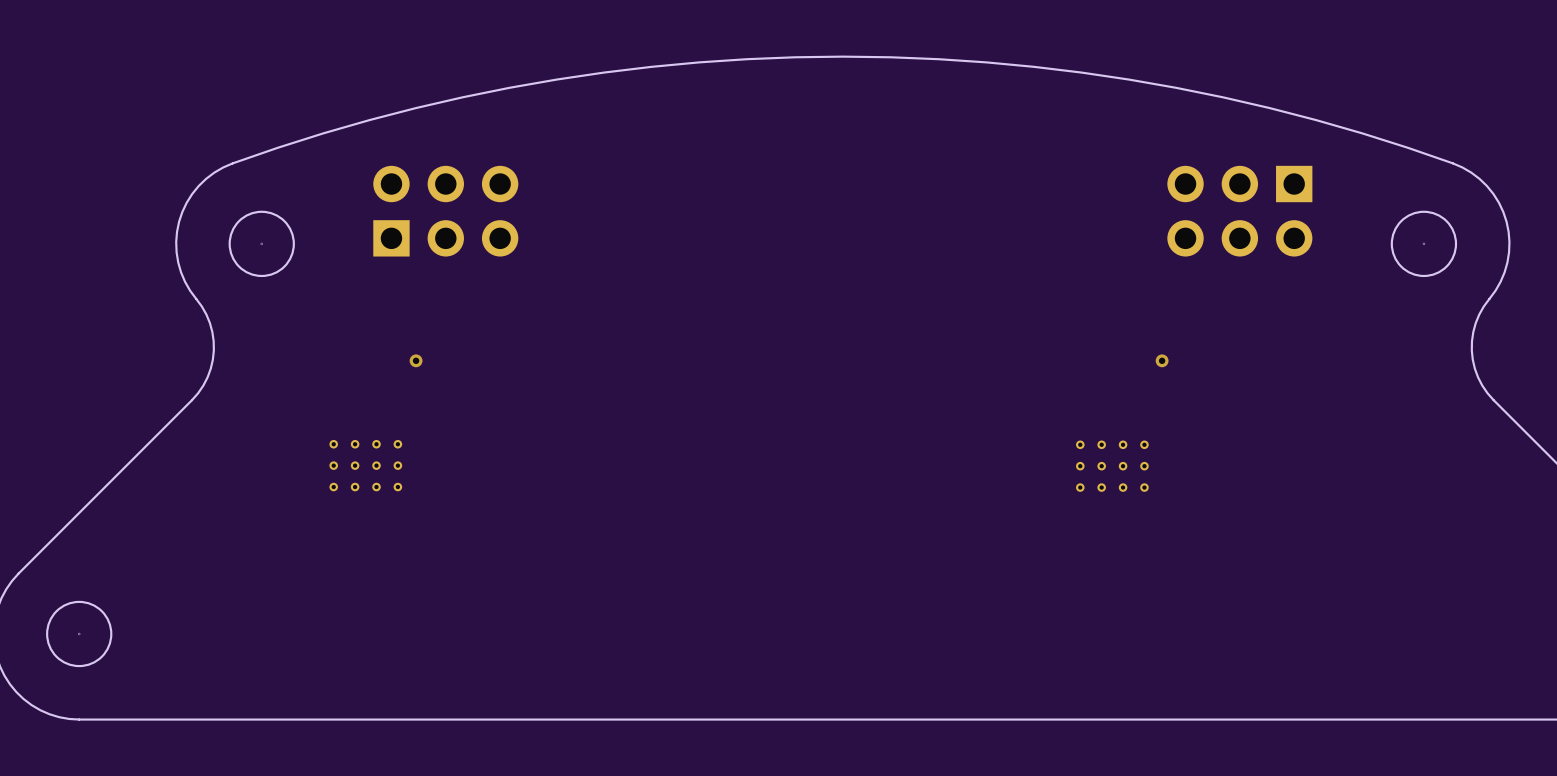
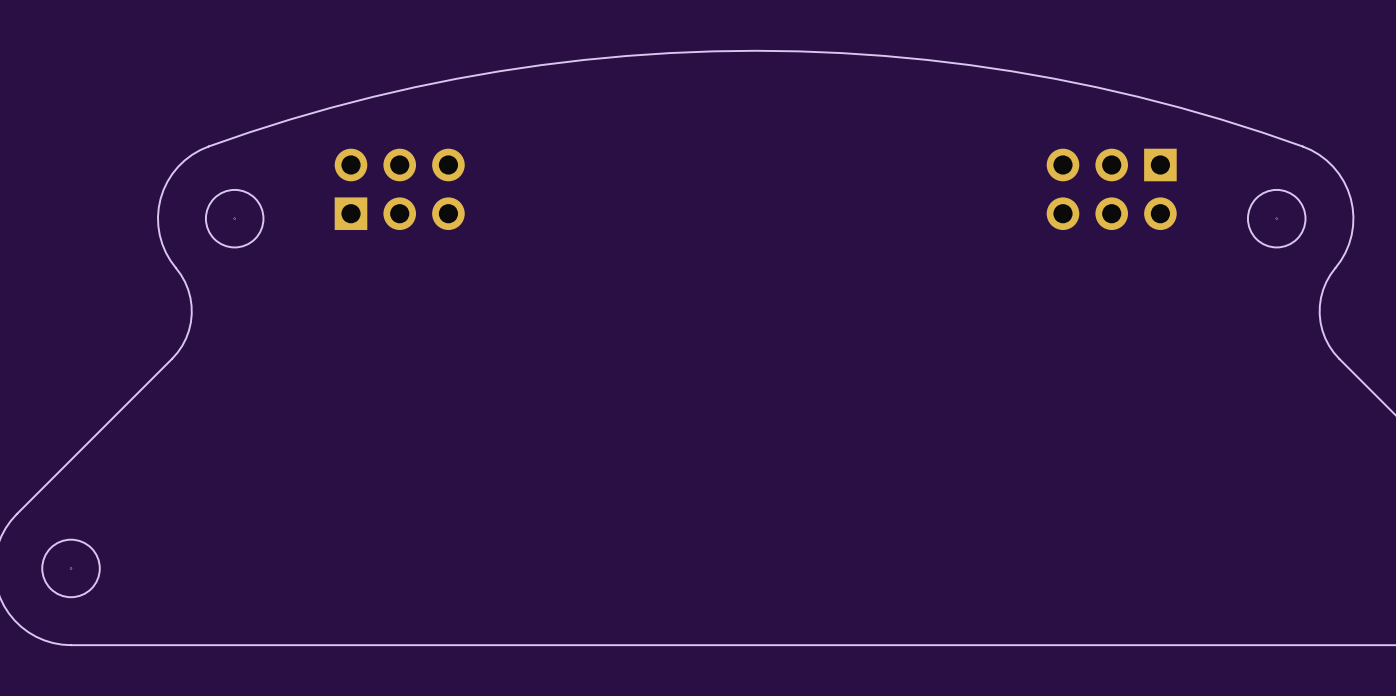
via: (416, 360) -> none
via: (1162, 360) -> none
part: (365, 465) -> none
part: (1112, 466) -> none

